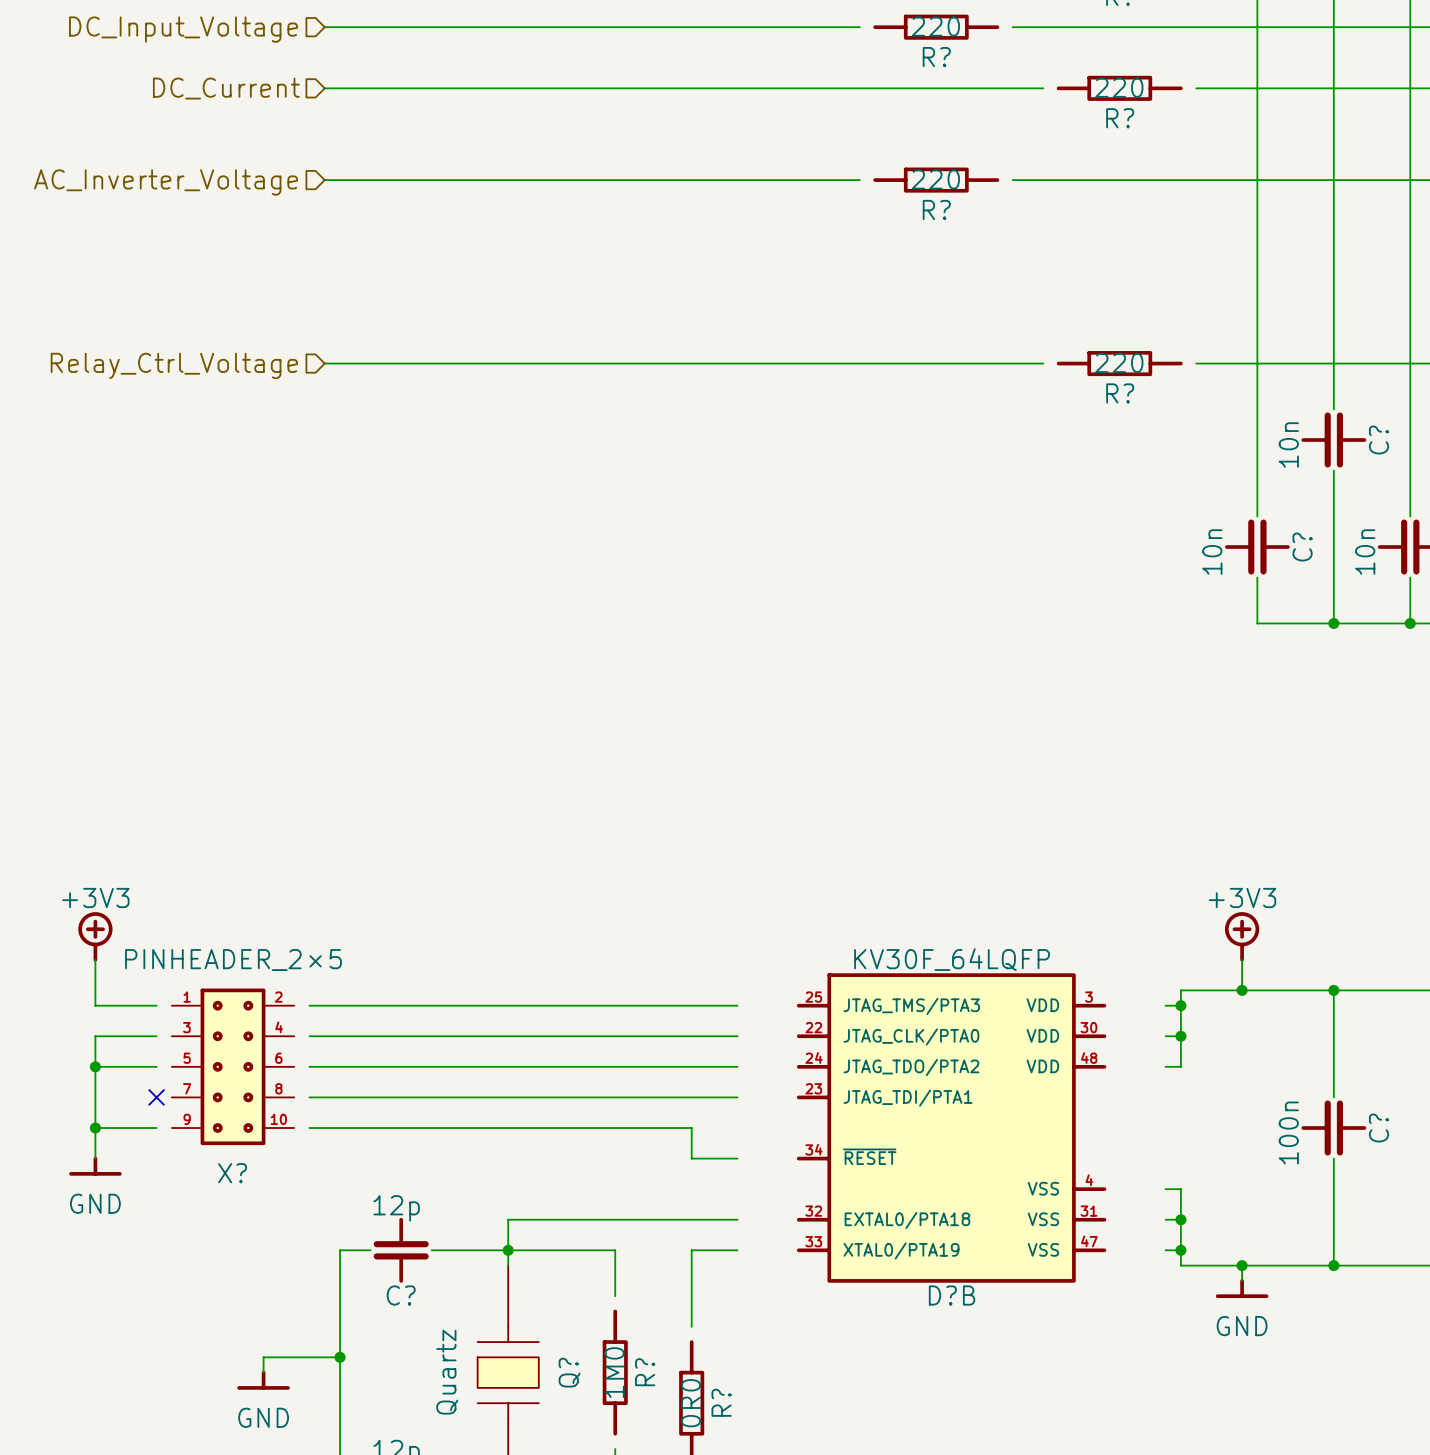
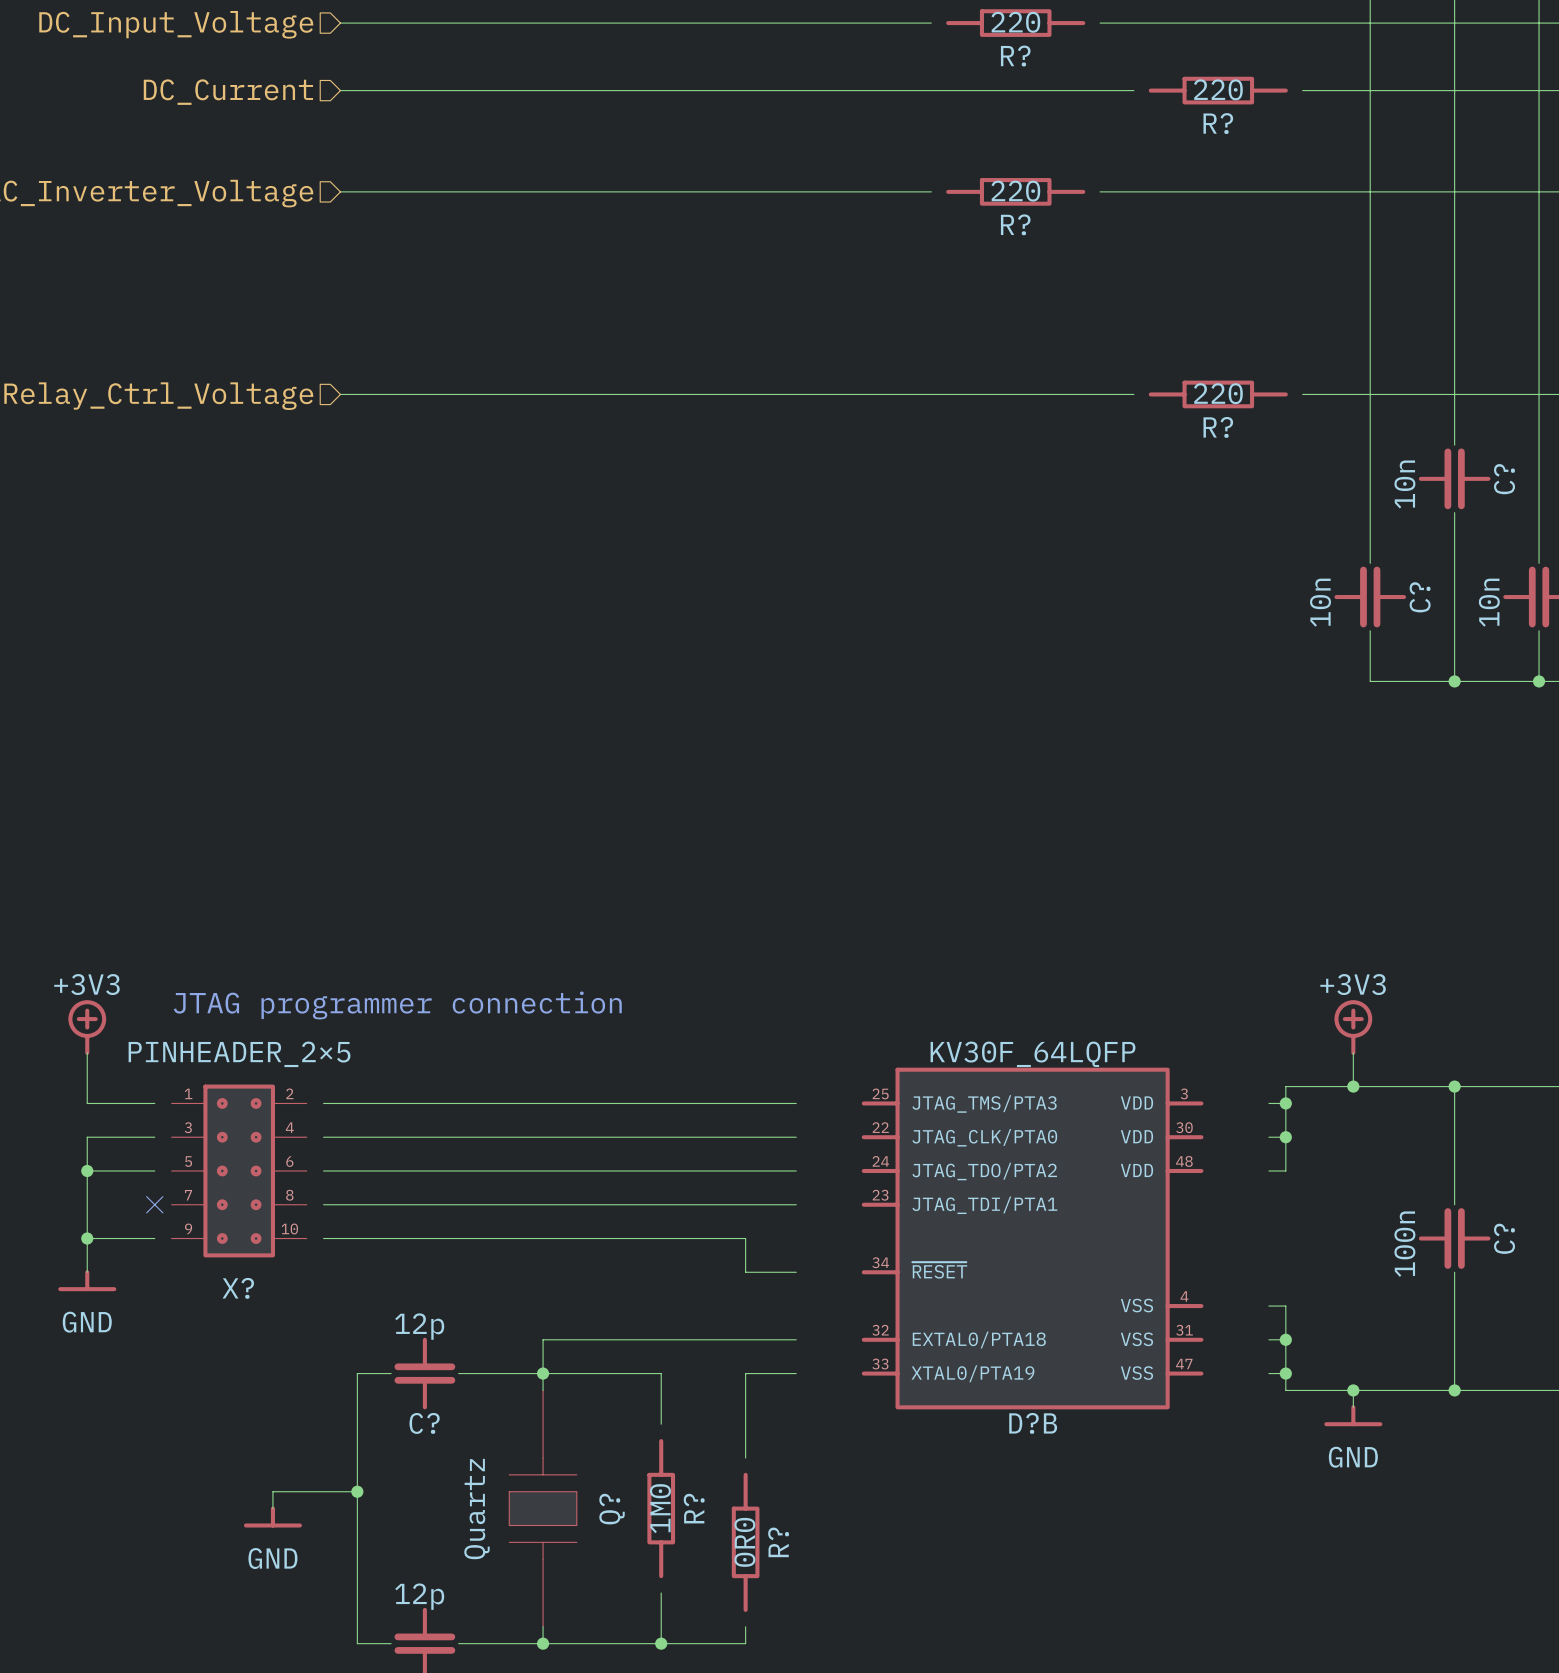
text: none -> JTAG programmer connection (397, 1005)

